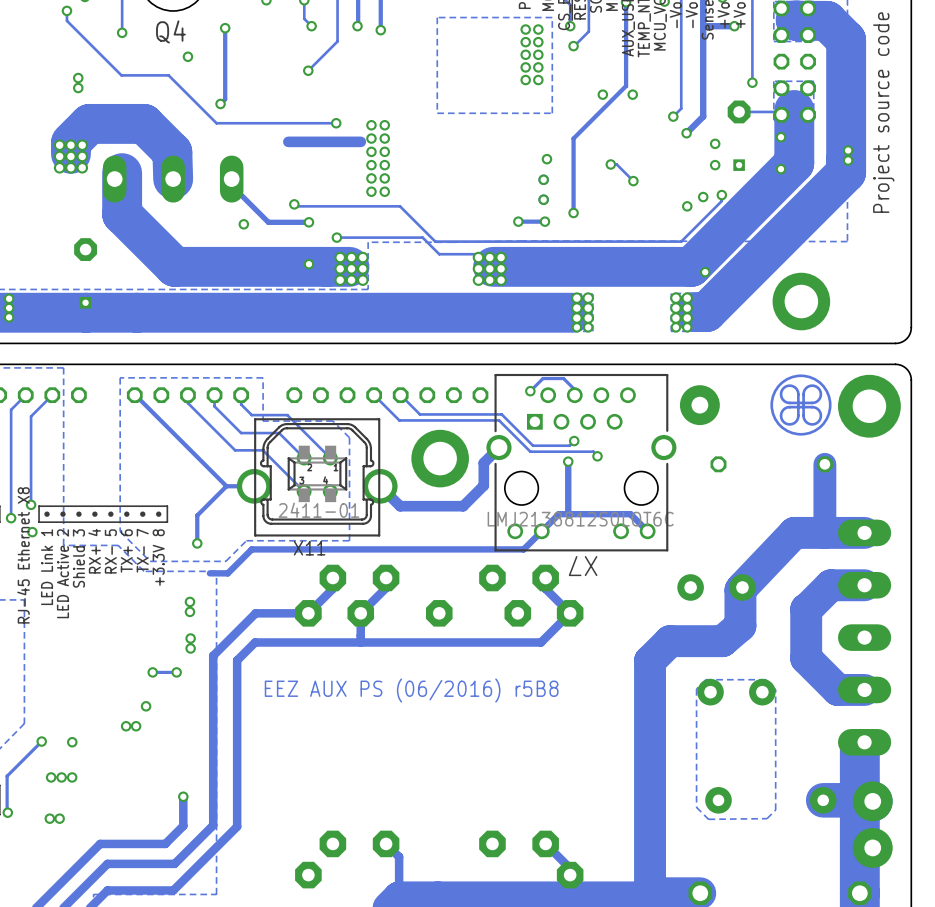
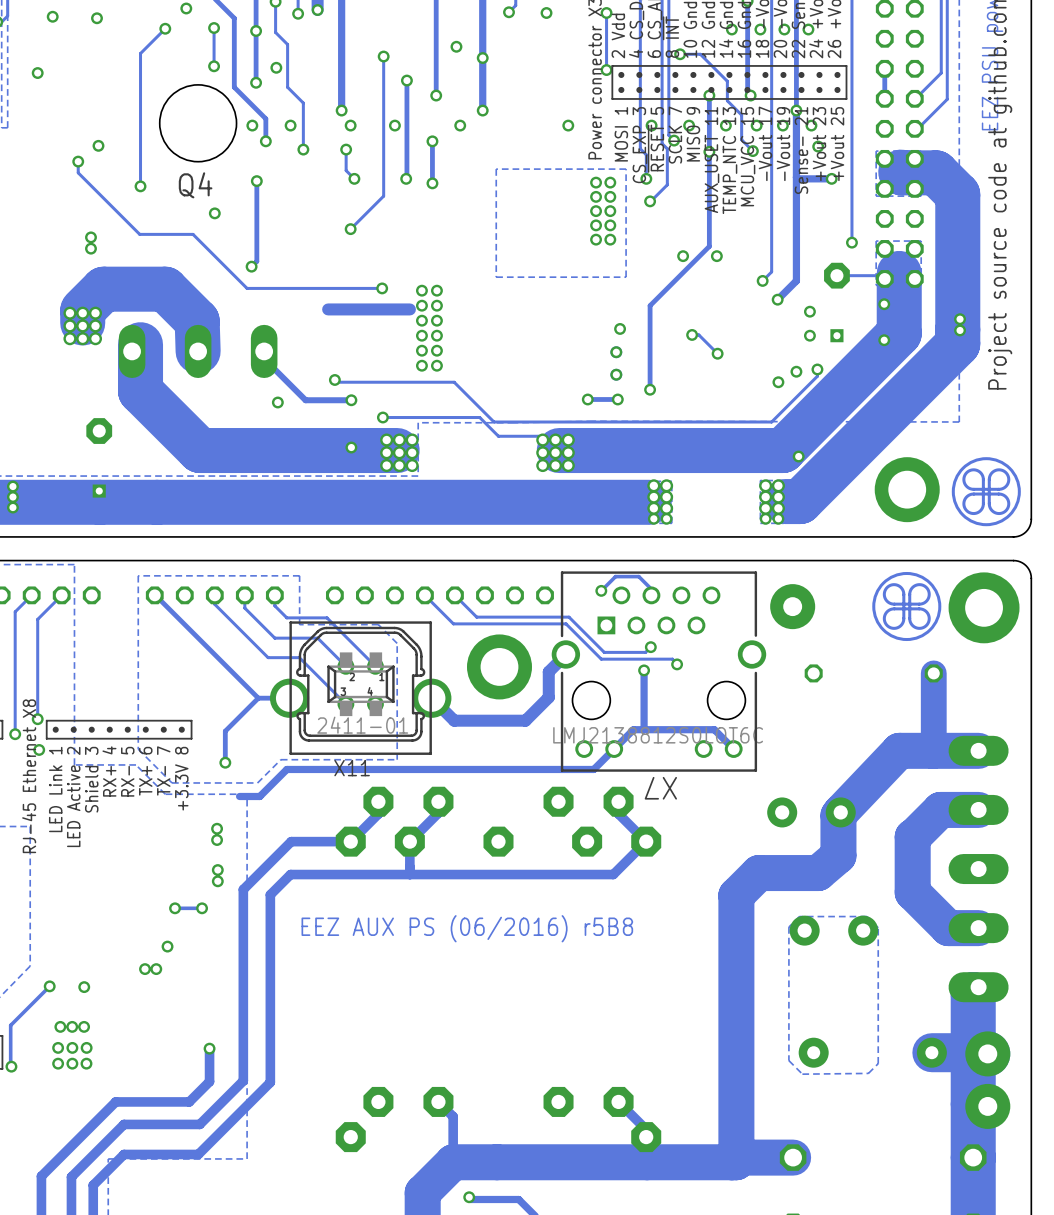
drawing: none -> [951, 457, 1021, 527]
via: none -> (58, 1047)
via: none -> (72, 1047)
via: none -> (86, 1047)
via: none -> (58, 1063)
via: none -> (72, 1063)
via: none -> (86, 1063)
via: (49, 818) -> none
via: (59, 818) -> none

